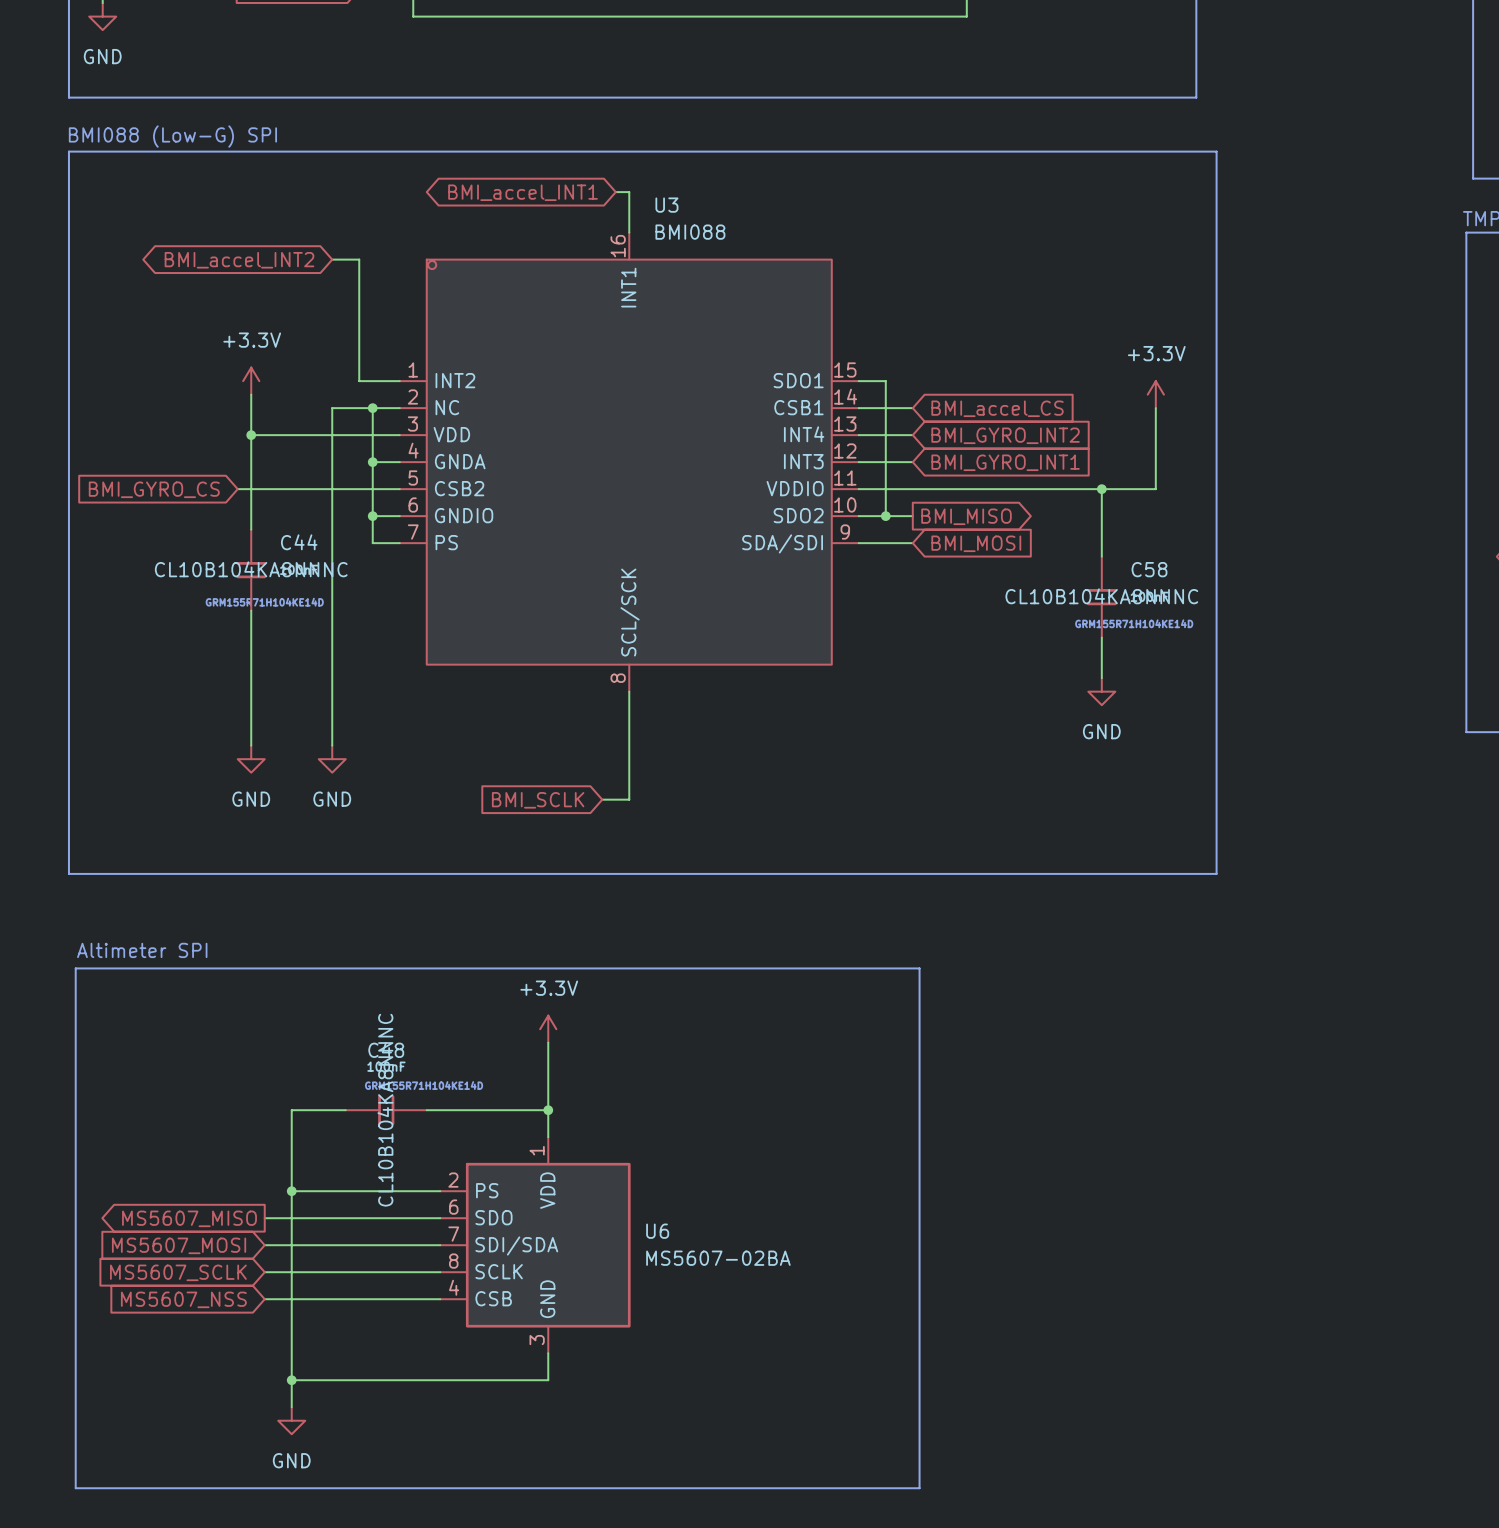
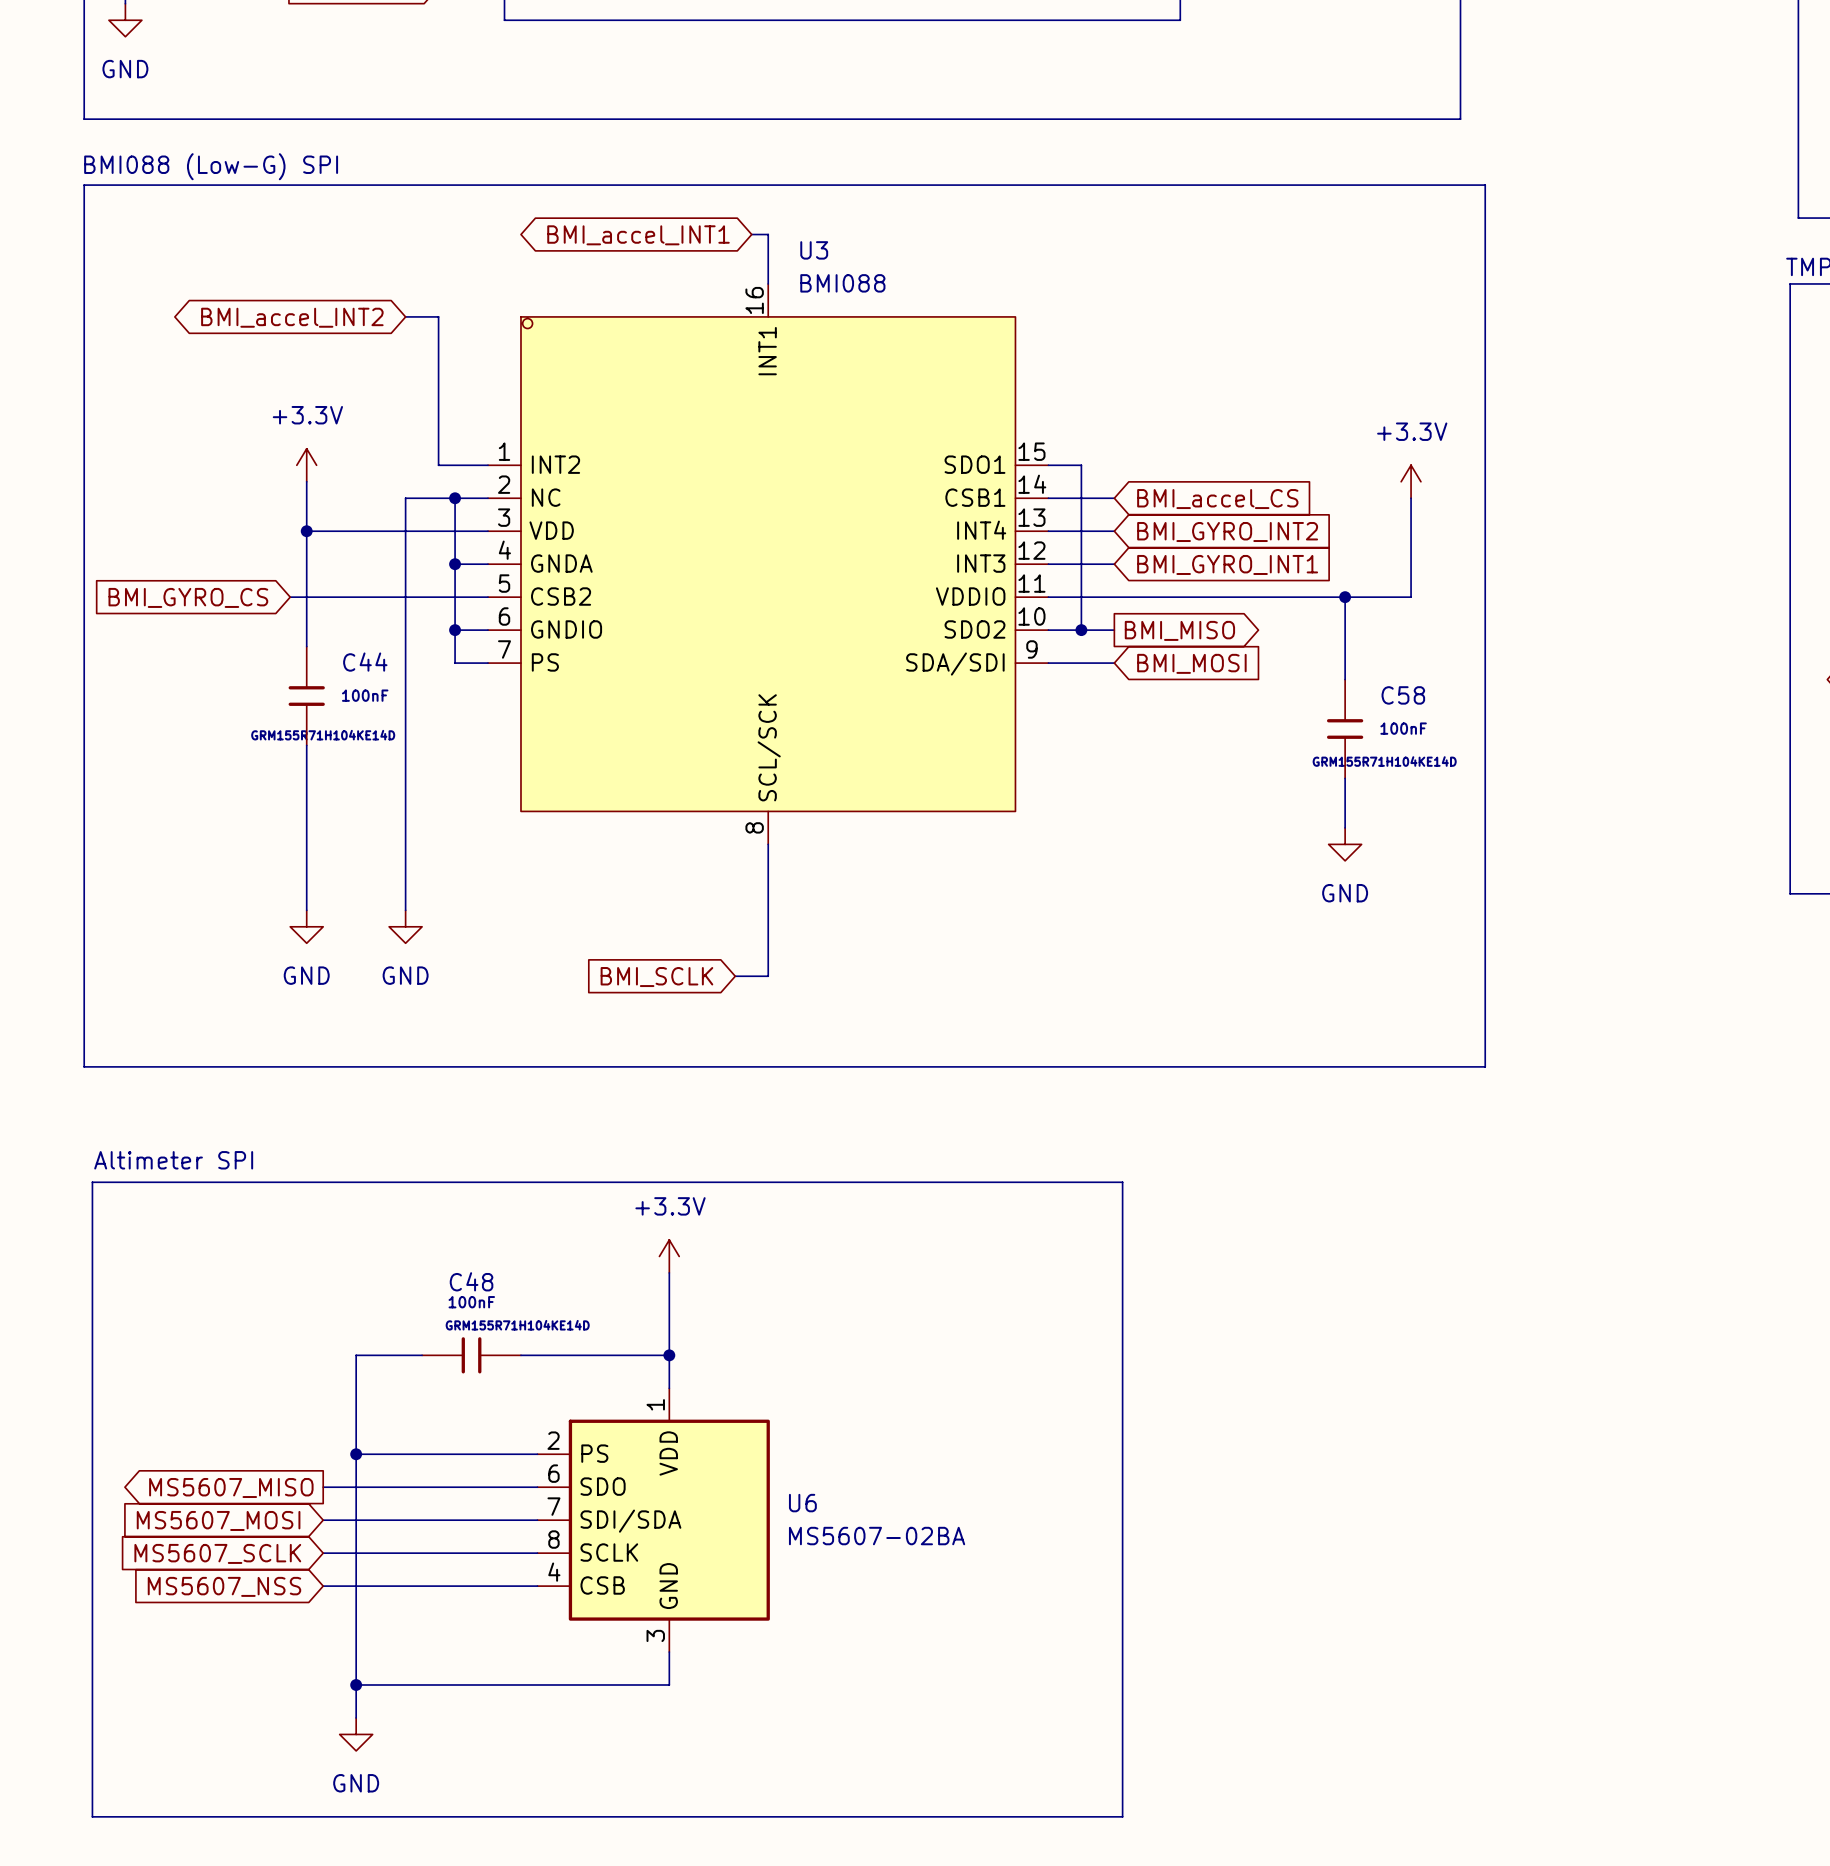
C44 text: CL10B104KA8NNNC (251, 569) -> none
C58 text: CL10B104KA8NNNC (1101, 596) -> none
C48 text: CL10B104KA8NNNC (385, 1110) -> none

